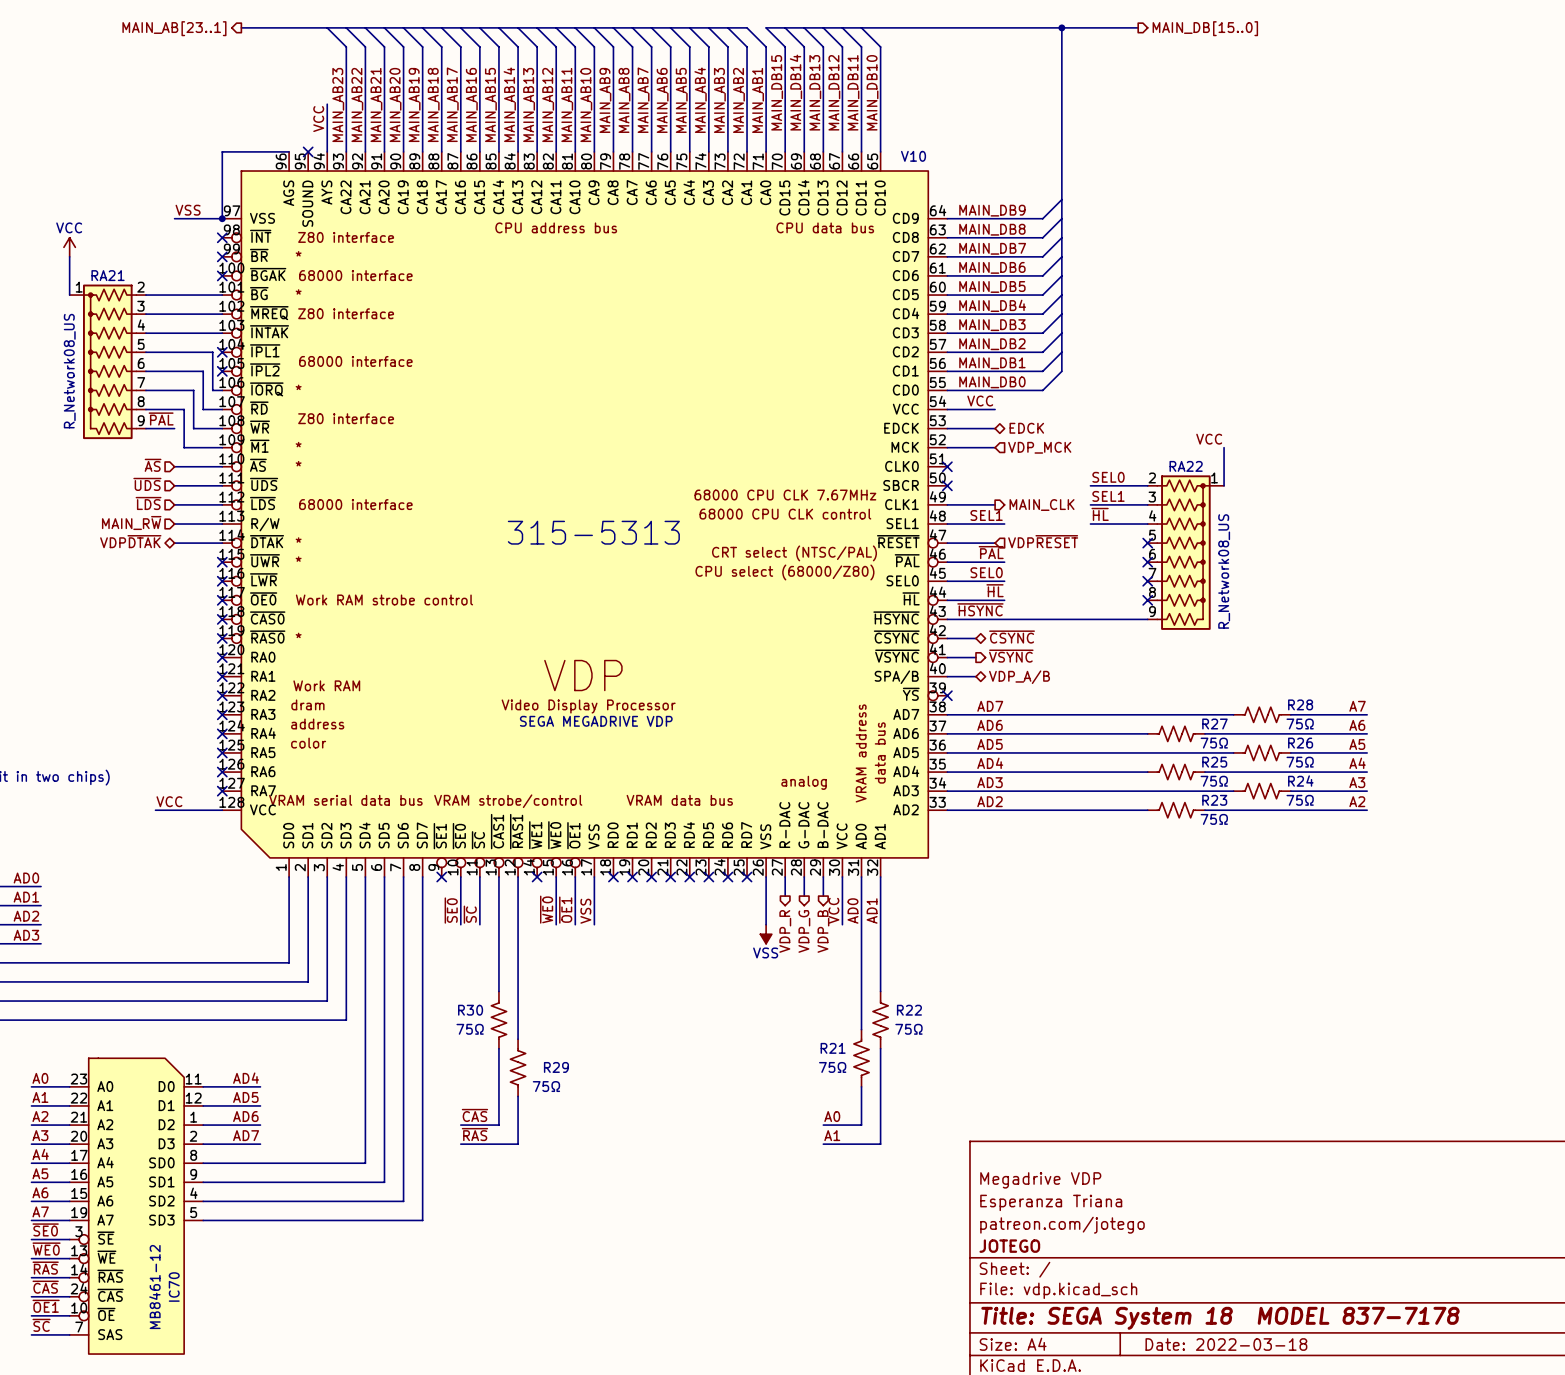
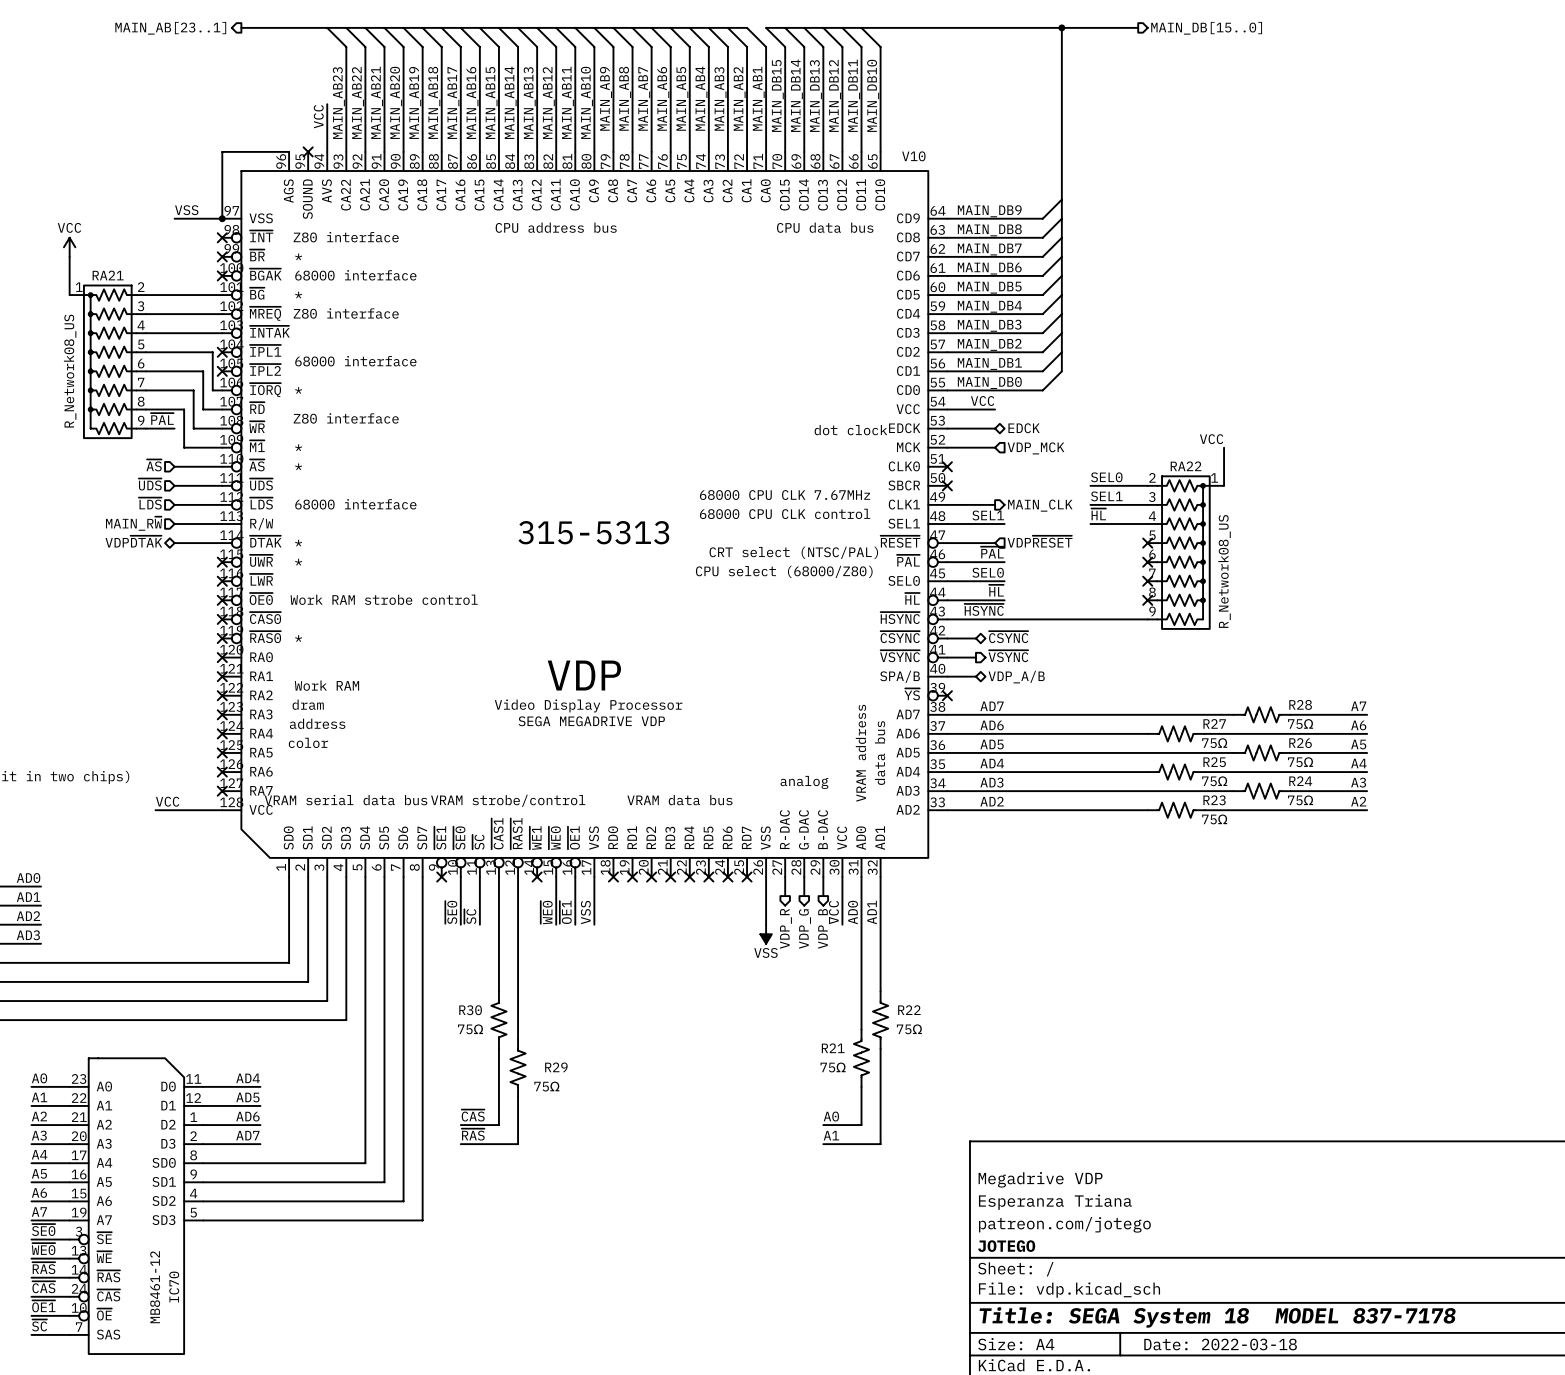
V10 pin name: AYS (326, 192) -> AVS (326, 191)
text: none -> dot clock (850, 430)

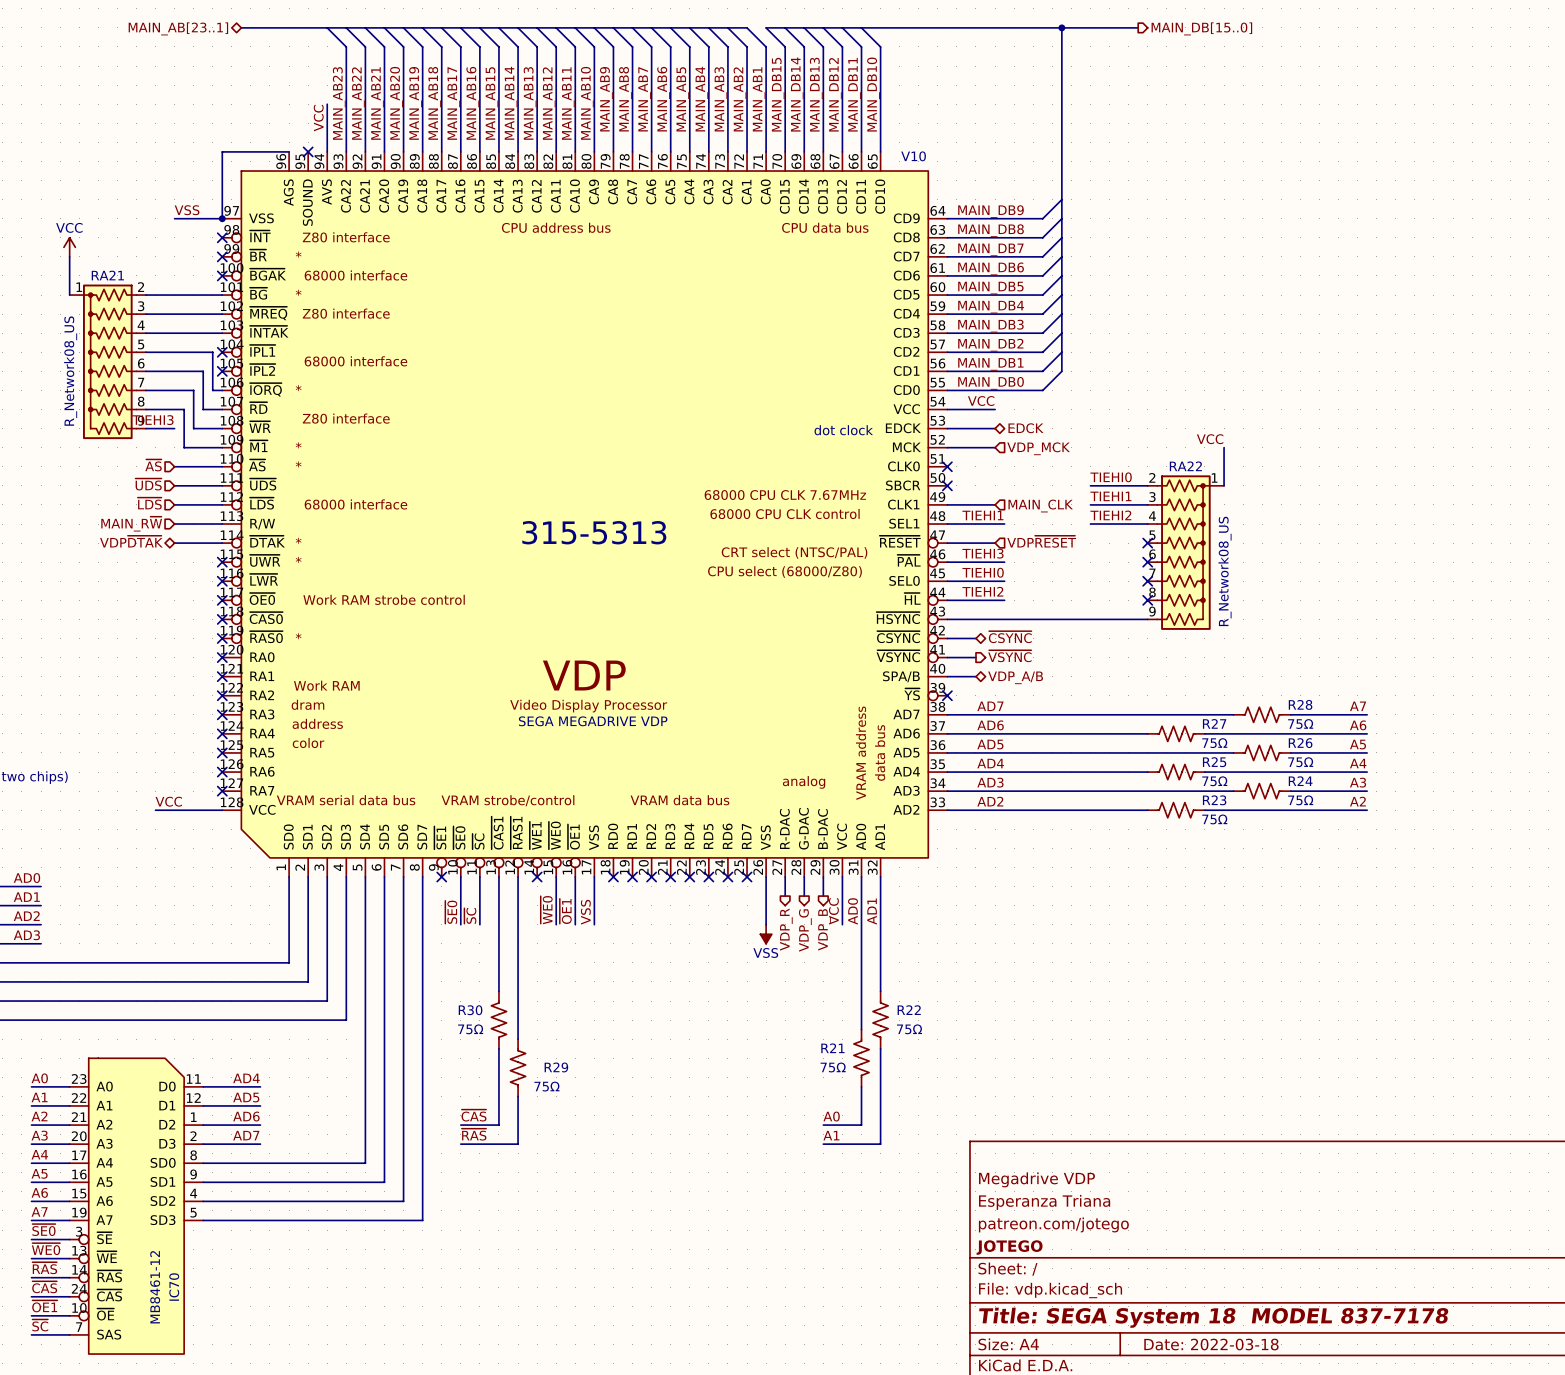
hierarchical label shape: output (170, 28) -> bidirectional (178, 28)
label: ~{PAL} (162, 418) -> TIEHI3 (152, 420)
label: SEL0 (1106, 477) -> TIEHI0 (1111, 477)
label: SEL1 (1106, 496) -> TIEHI1 (1110, 496)
hierarchical label shape: output (1040, 505) -> input (1040, 506)
label: ~{HL} (1098, 514) -> TIEHI2 (1110, 515)
label: SEL1 (988, 515) -> TIEHI1 (982, 515)
label: ~{PAL} (992, 552) -> TIEHI3 (983, 553)
label: SEL0 (988, 572) -> TIEHI0 (983, 572)
label: ~{HL} (996, 590) -> TIEHI2 (982, 591)
label: ~{HSYNC} (984, 609) -> none

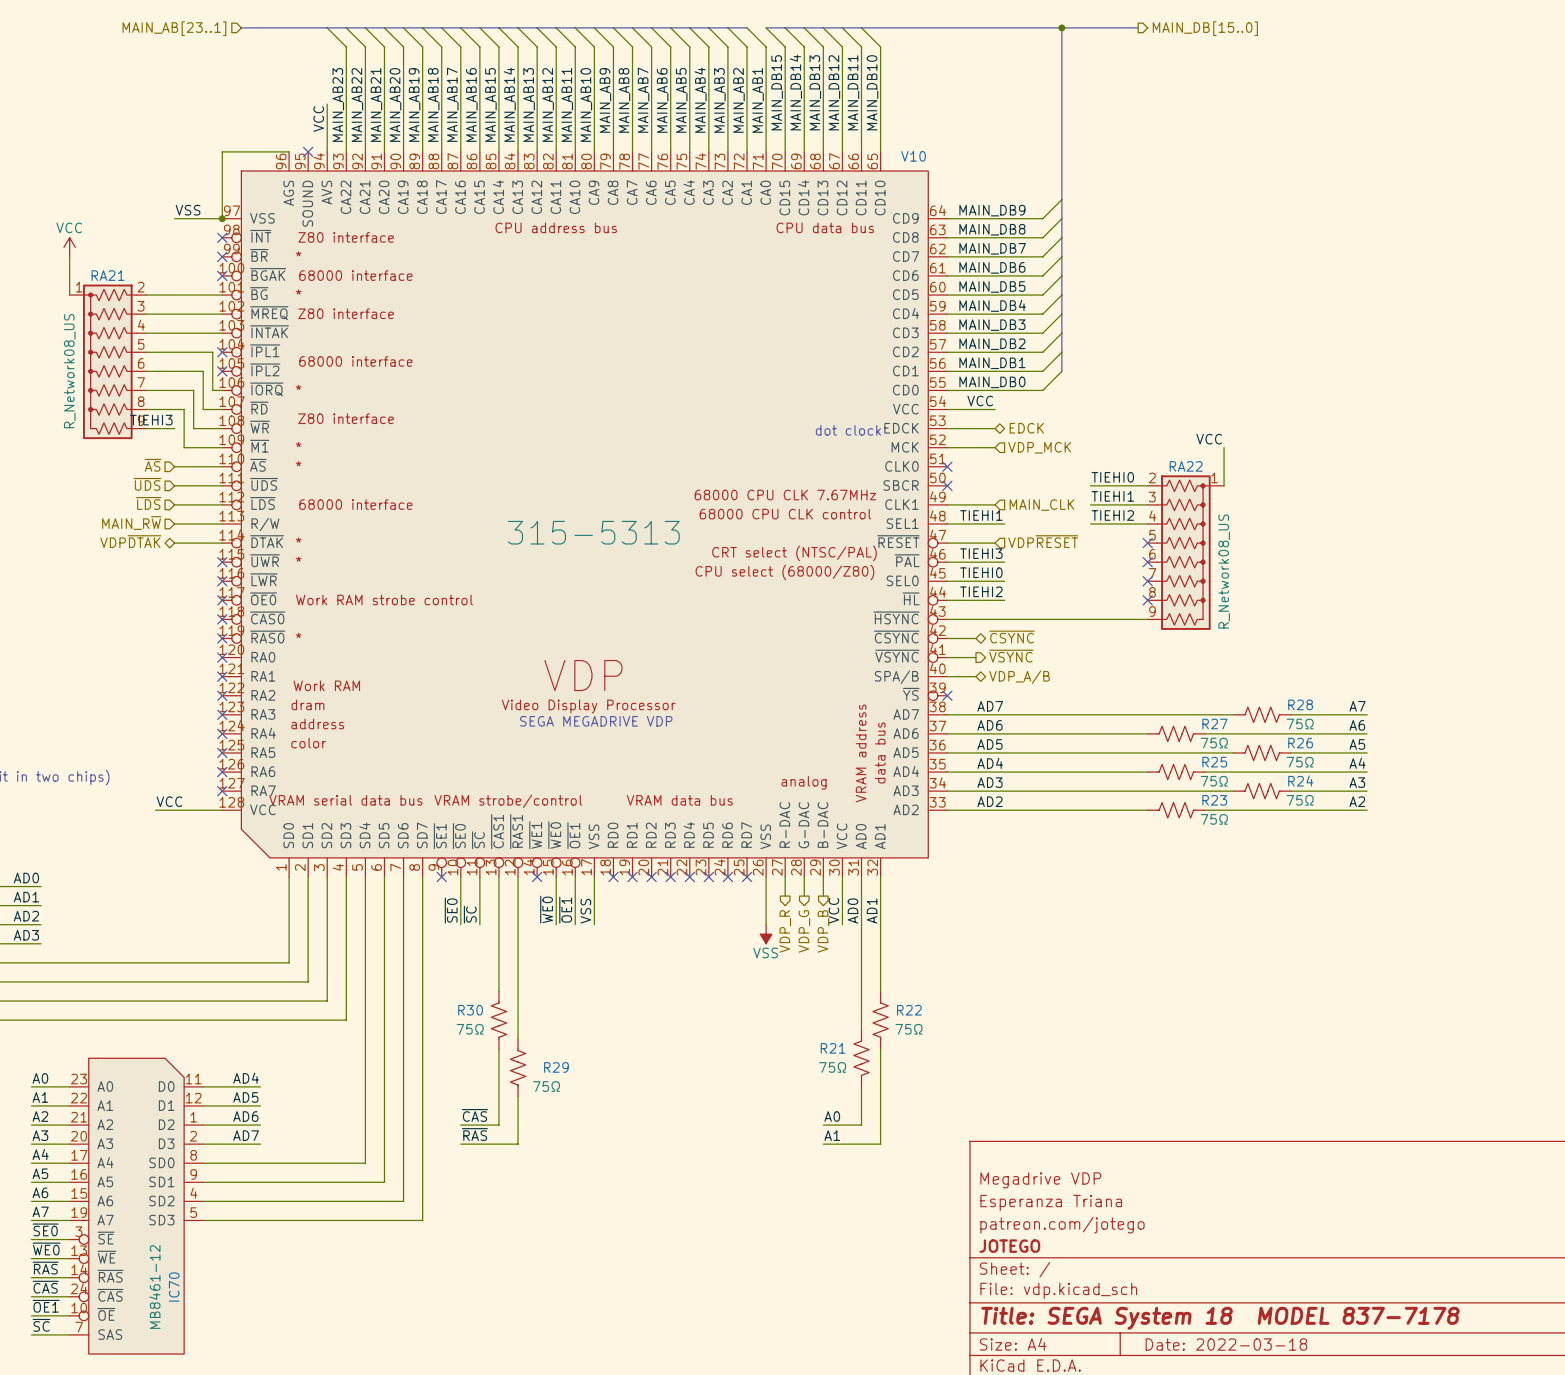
hierarchical label shape: bidirectional (178, 28) -> input (174, 28)

